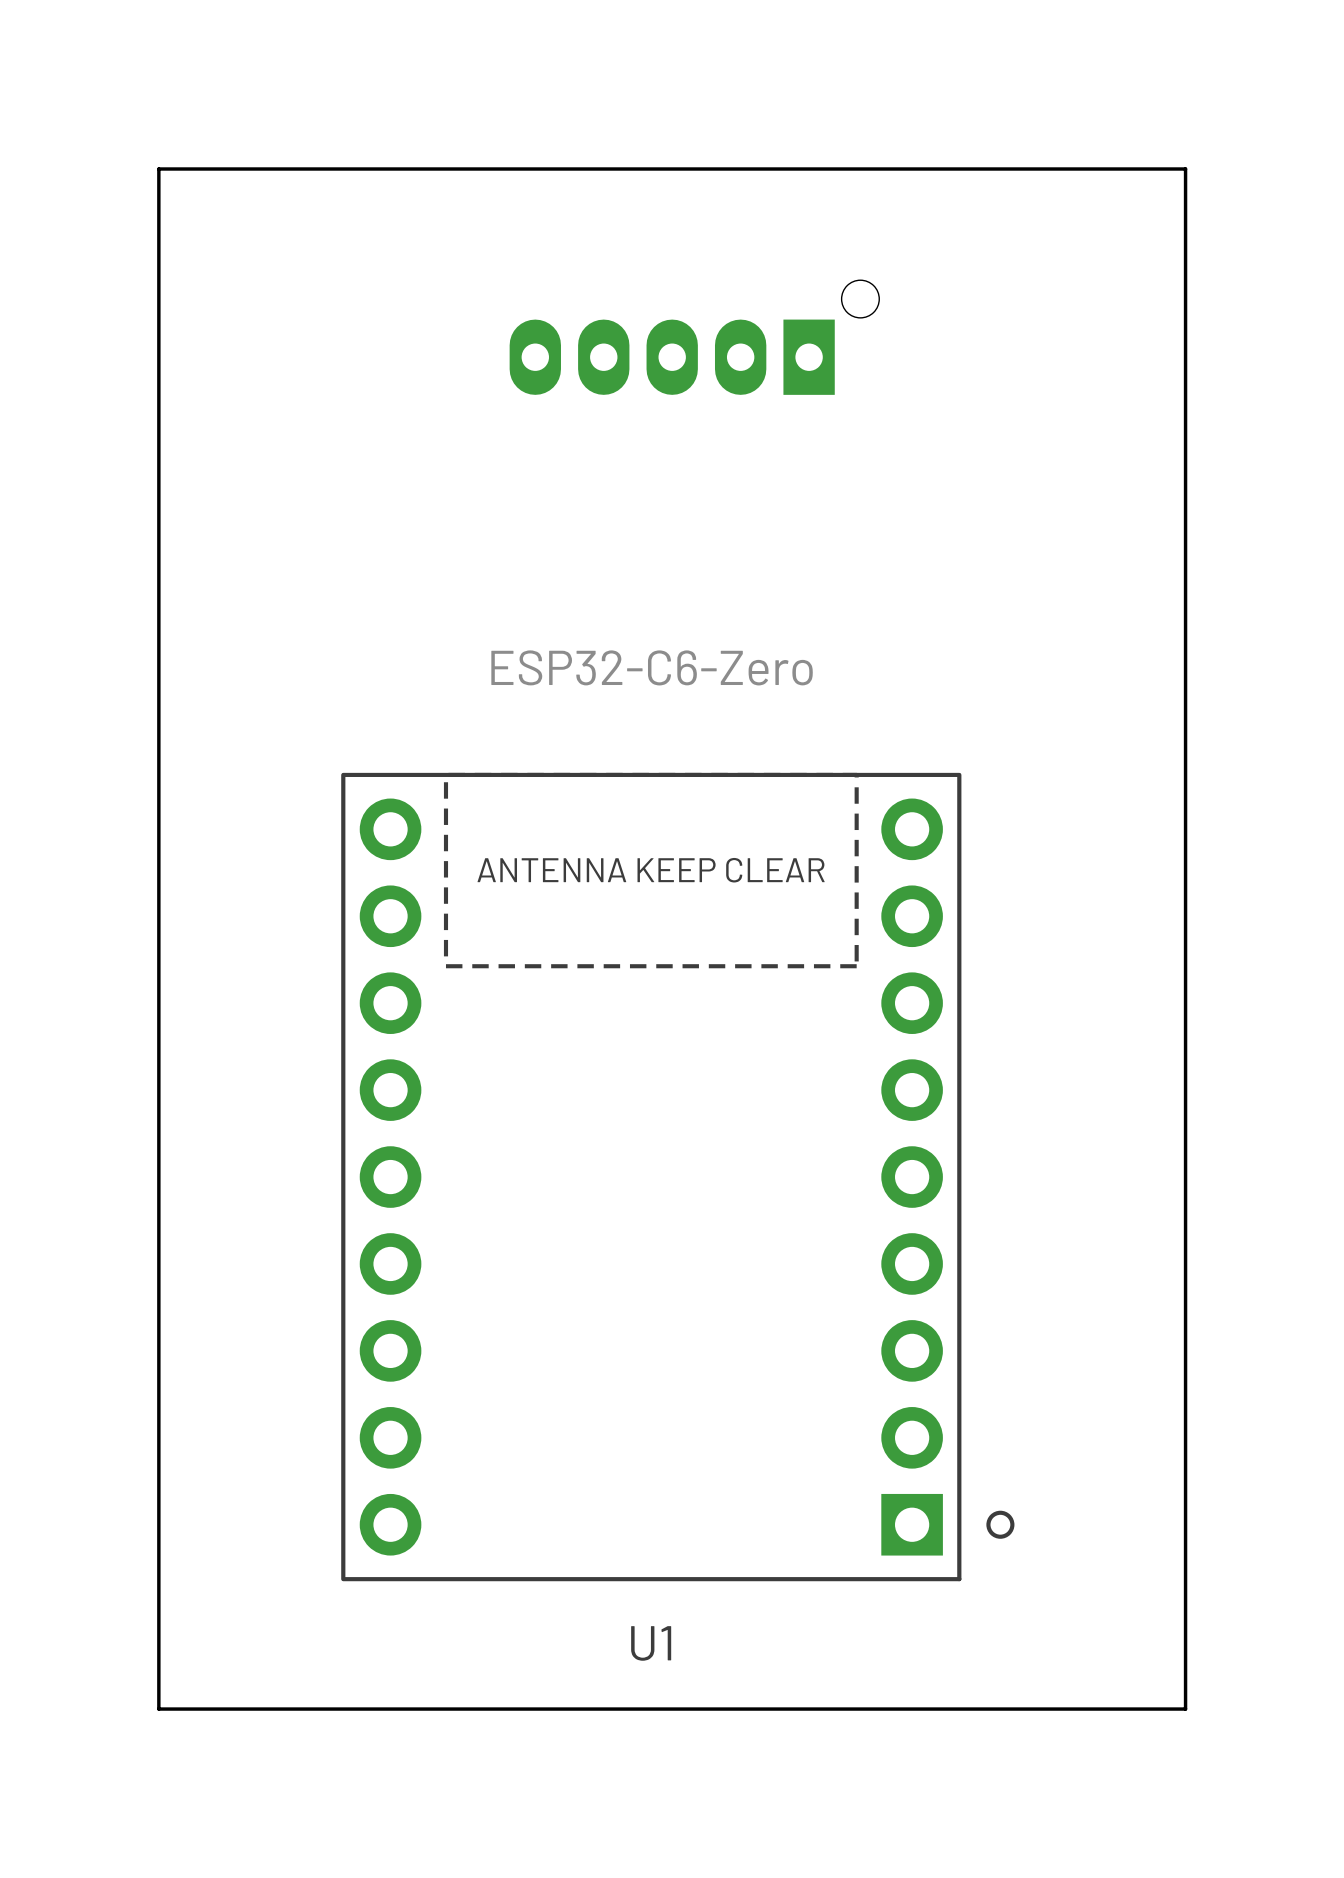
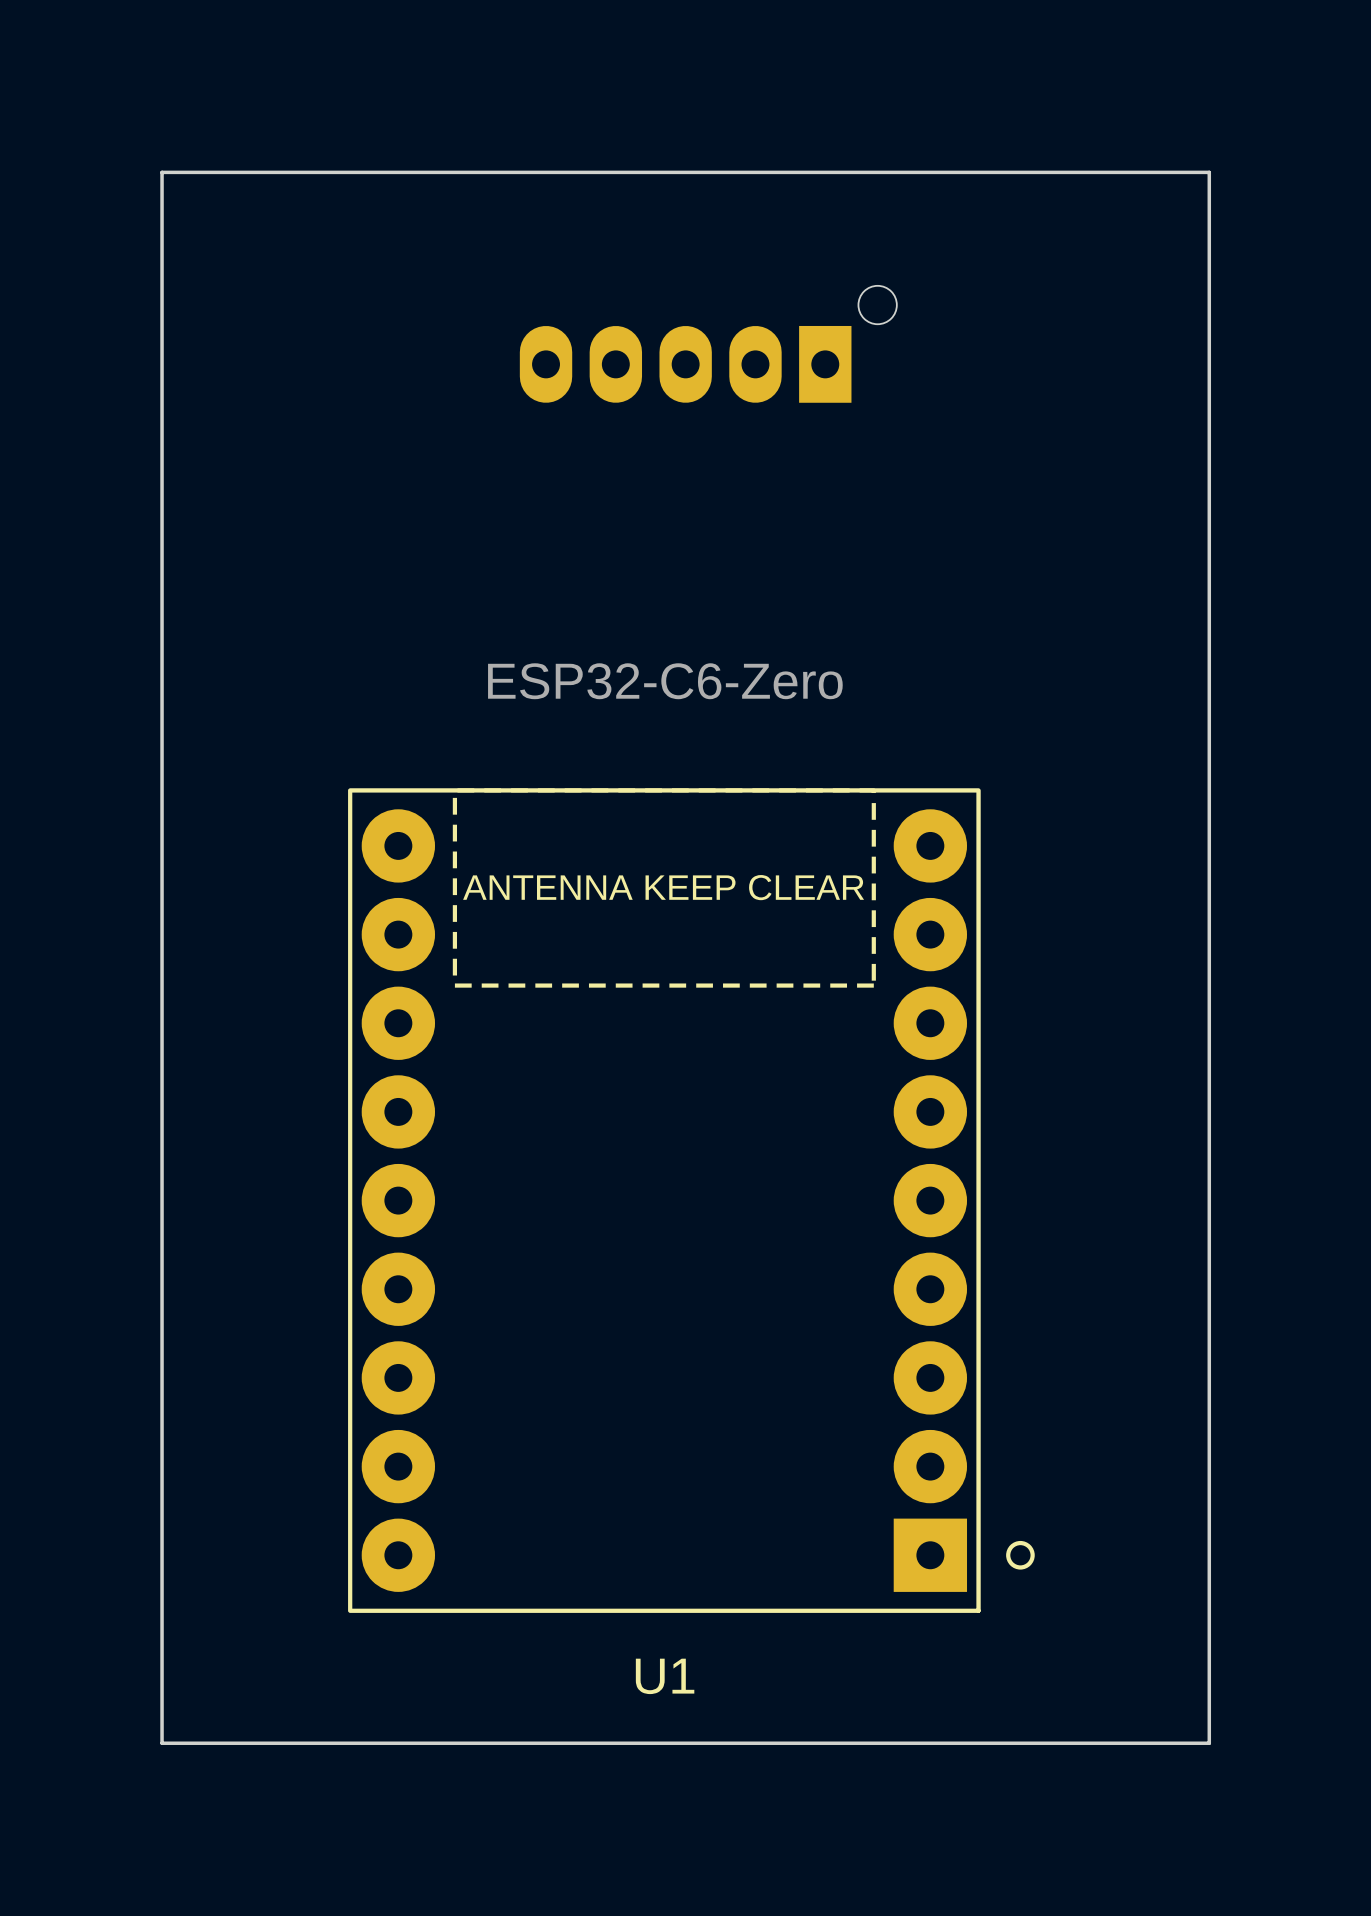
U1 footprint: [341, 772, 1015, 1582] -> [348, 788, 1035, 1613]

